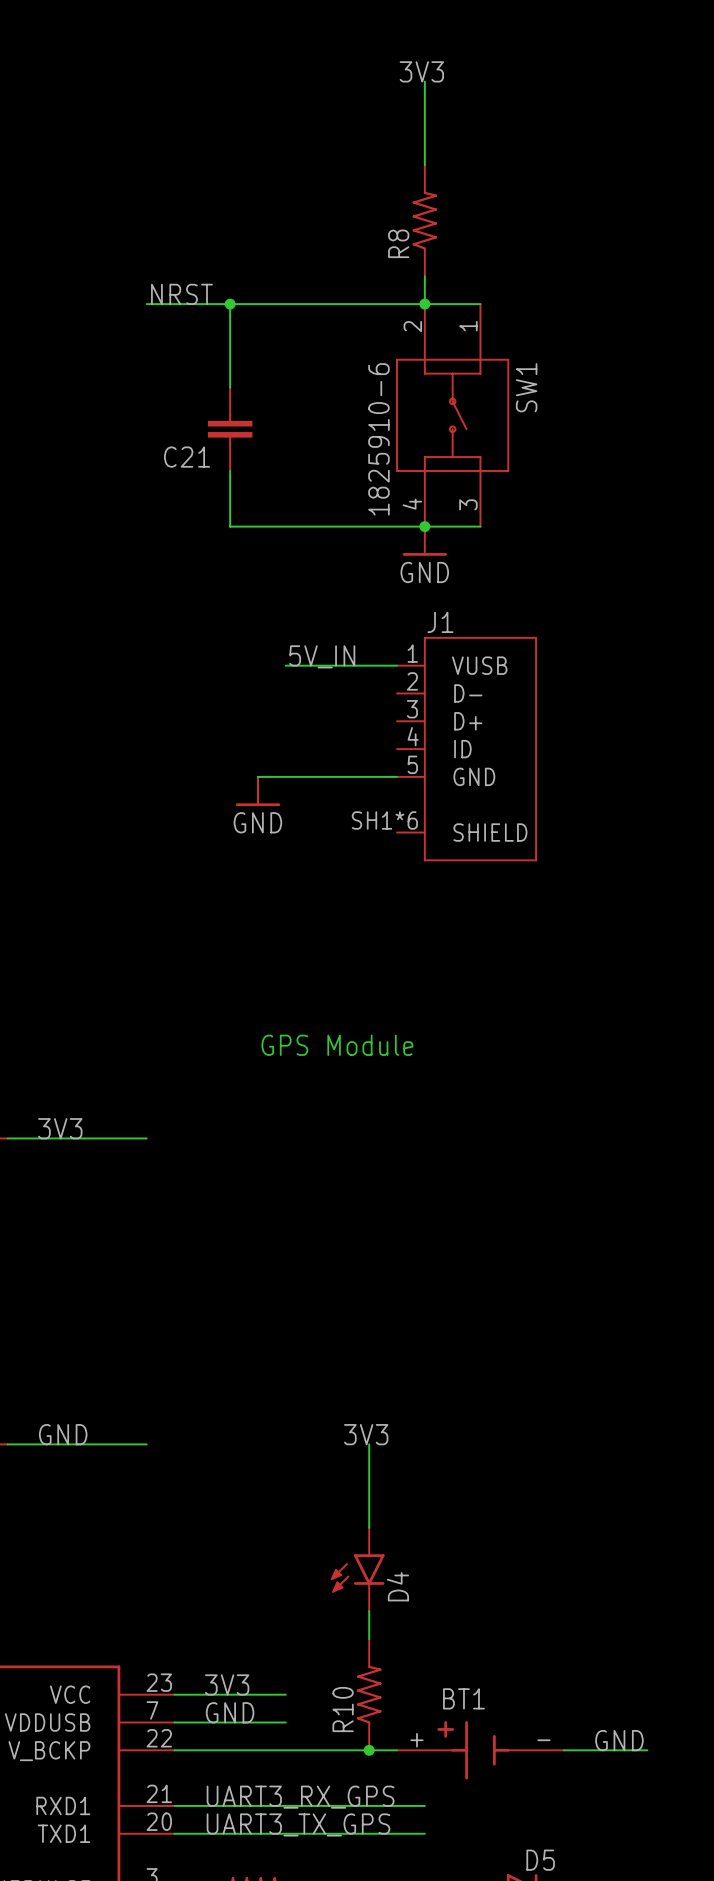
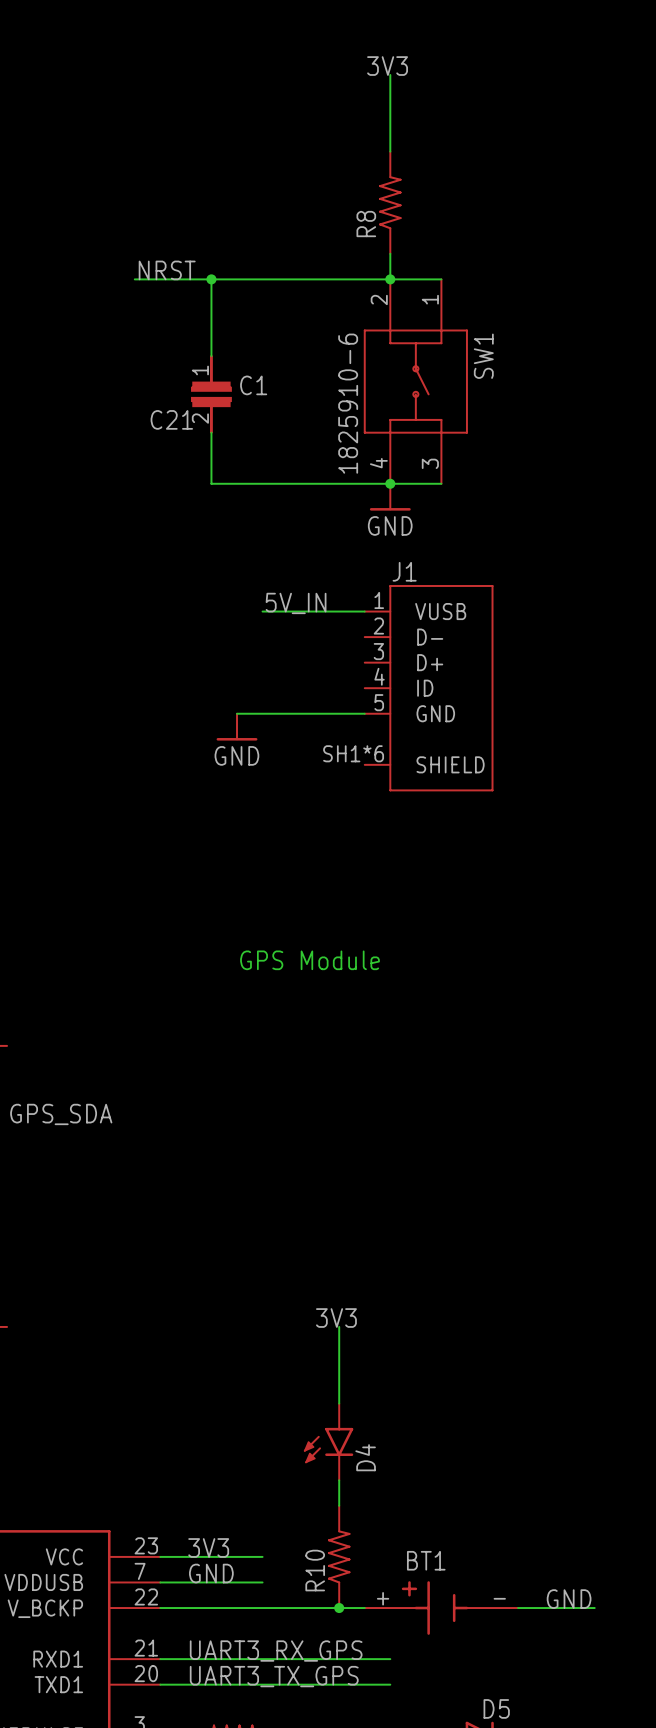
C1: none -> (211, 394)
label: 3V3 (60, 1128) -> none
wire: (7, 1138) (146, 1138) -> none
label: none -> GPS_SDA (61, 1114)
label: GND (63, 1434) -> none
wire: (7, 1444) (146, 1444) -> none

